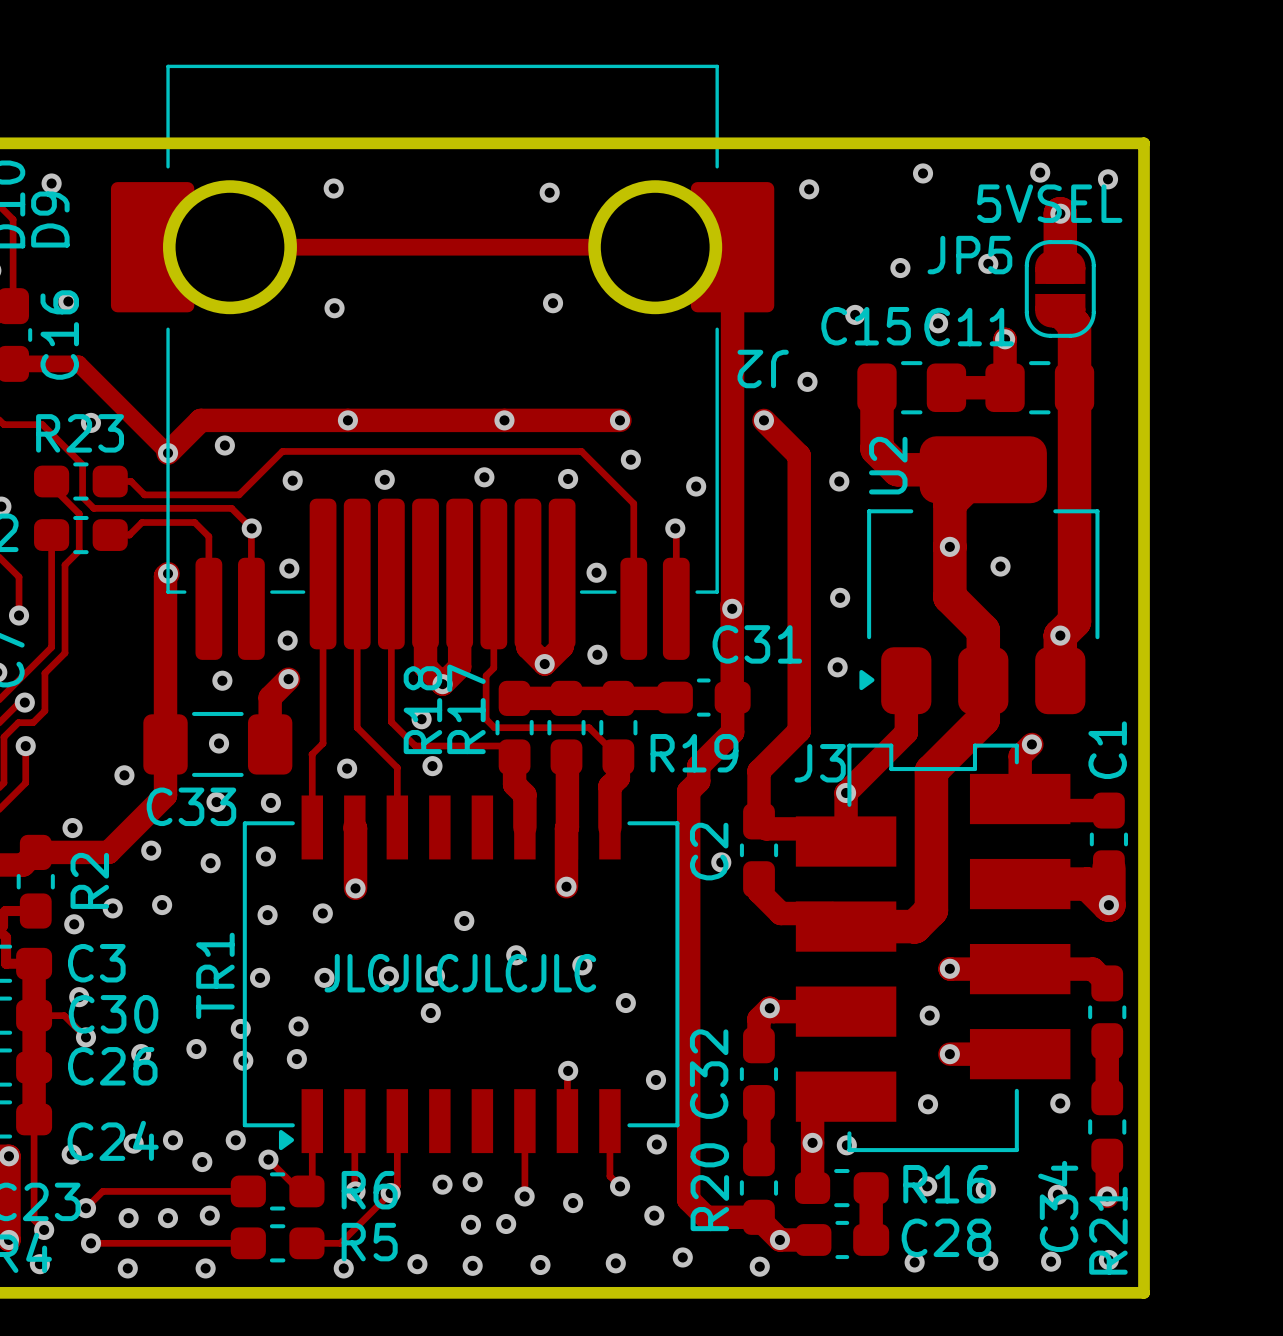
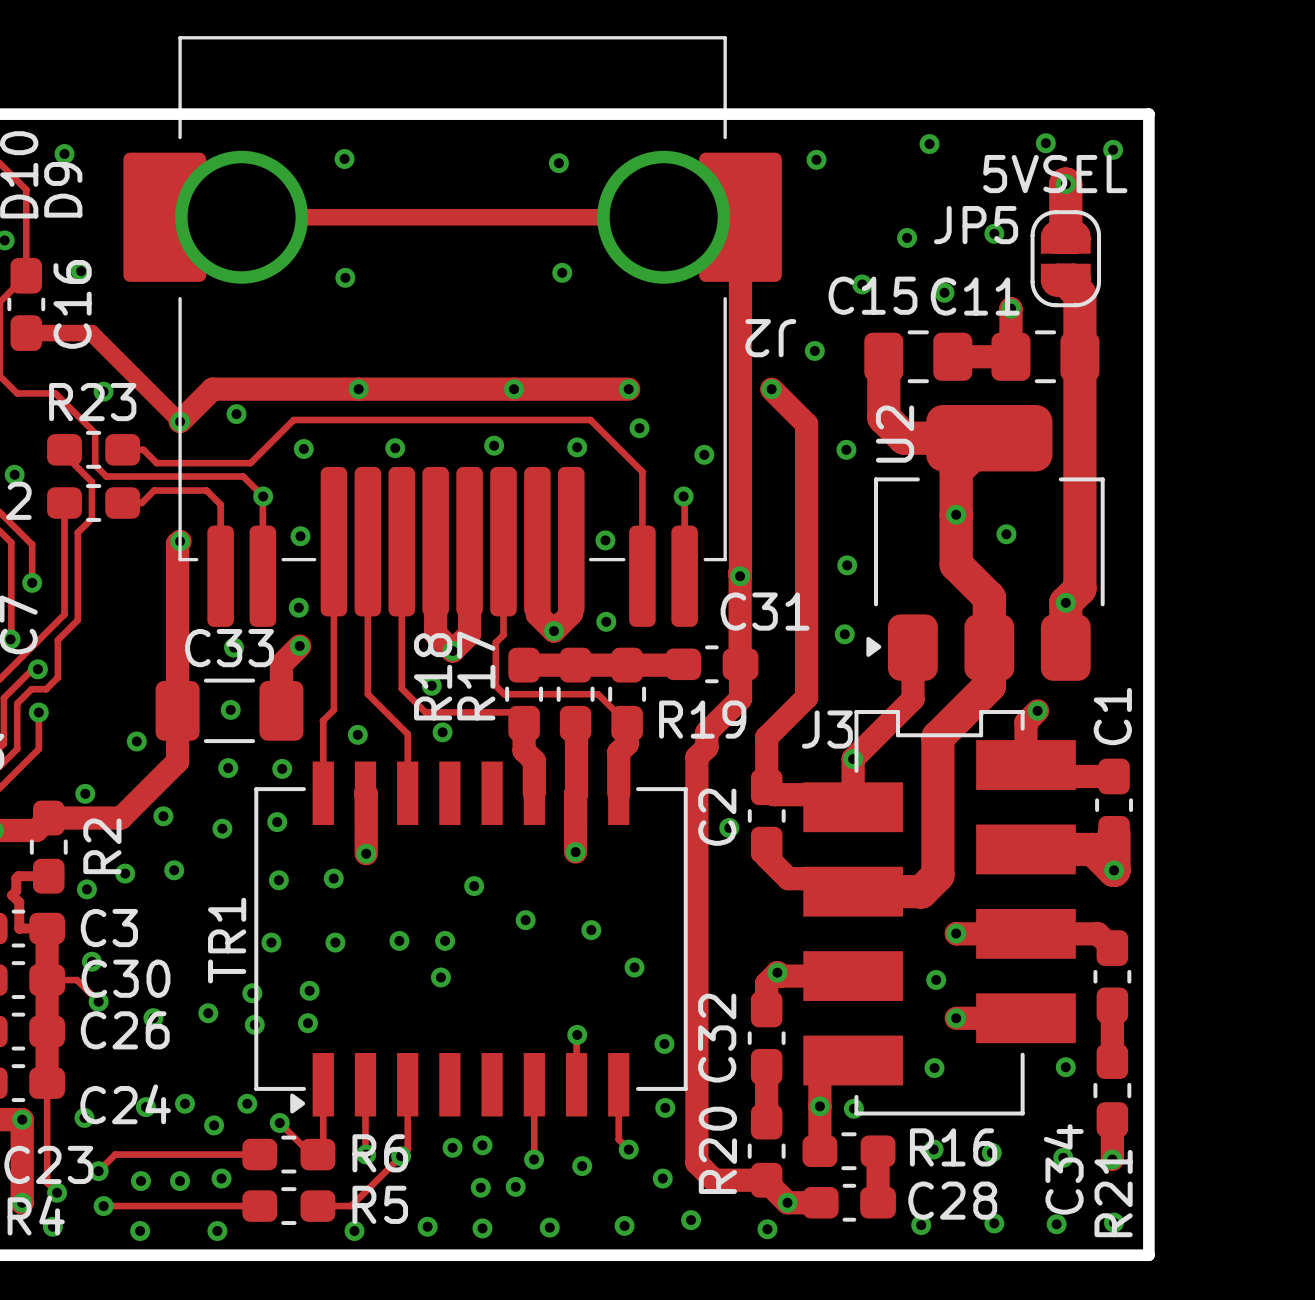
C33 name position: C33 (191, 806) -> C33 (229, 648)
text: JLCJLCJLCJLC (460, 973) -> none

